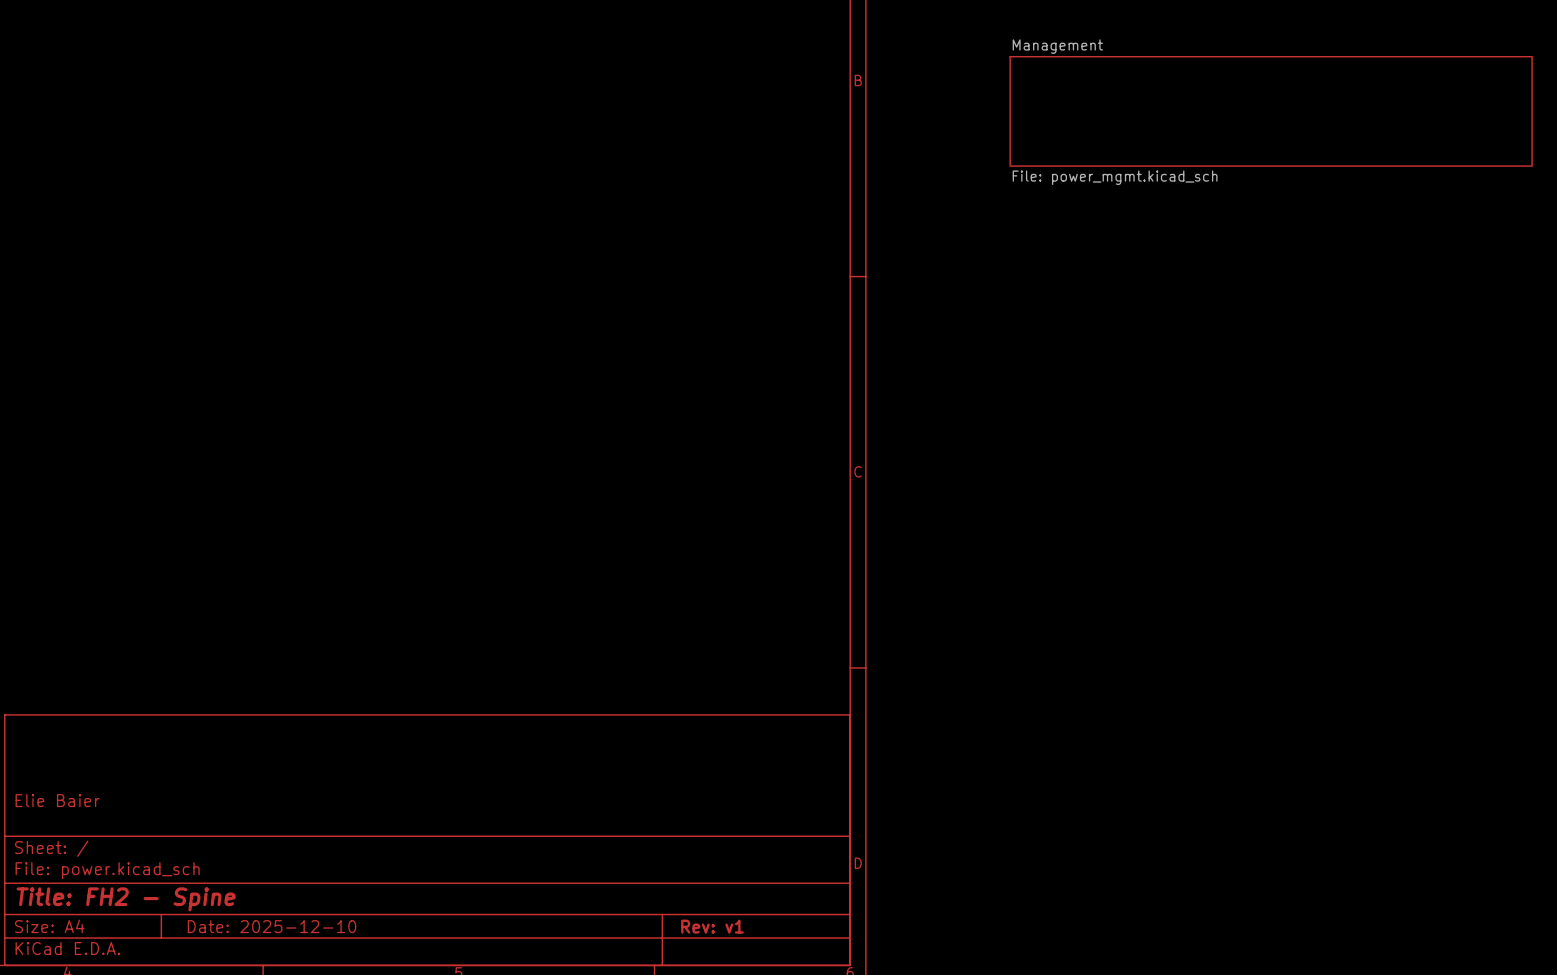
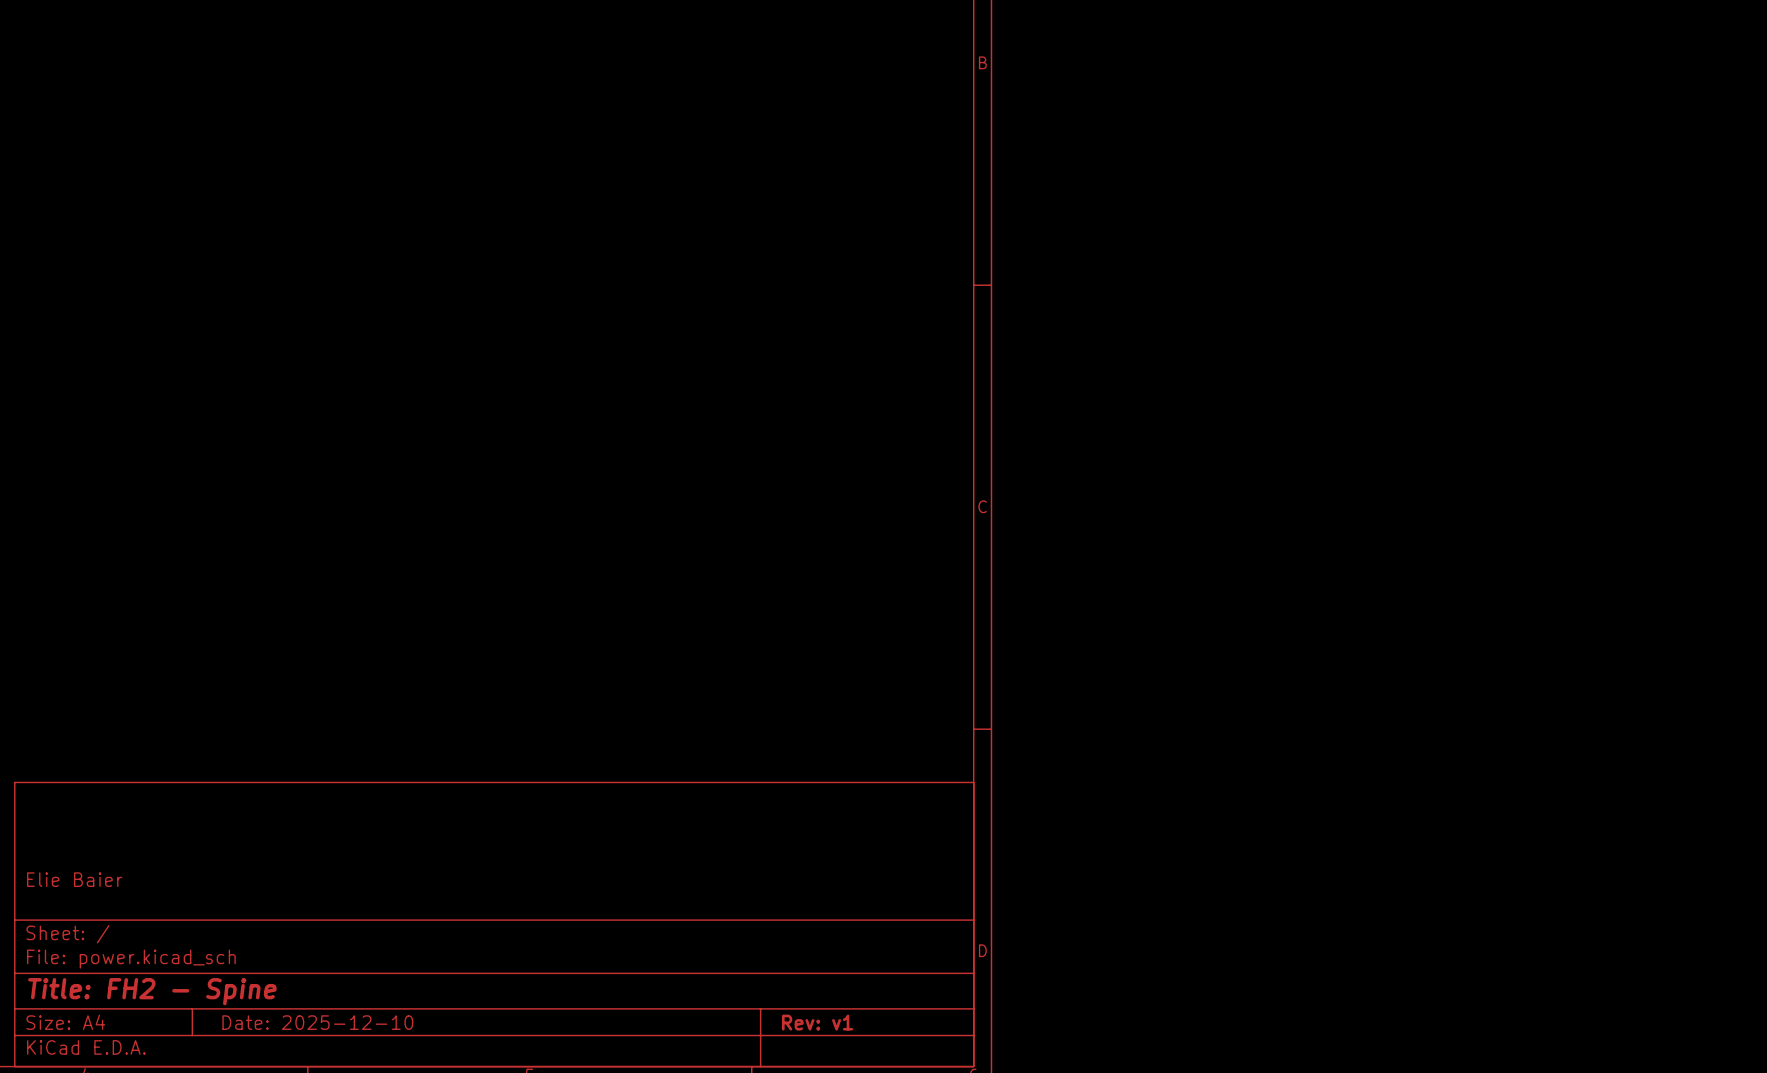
sheet Management: File: power_mgmt.kicad_sch (1271, 111) -> none

